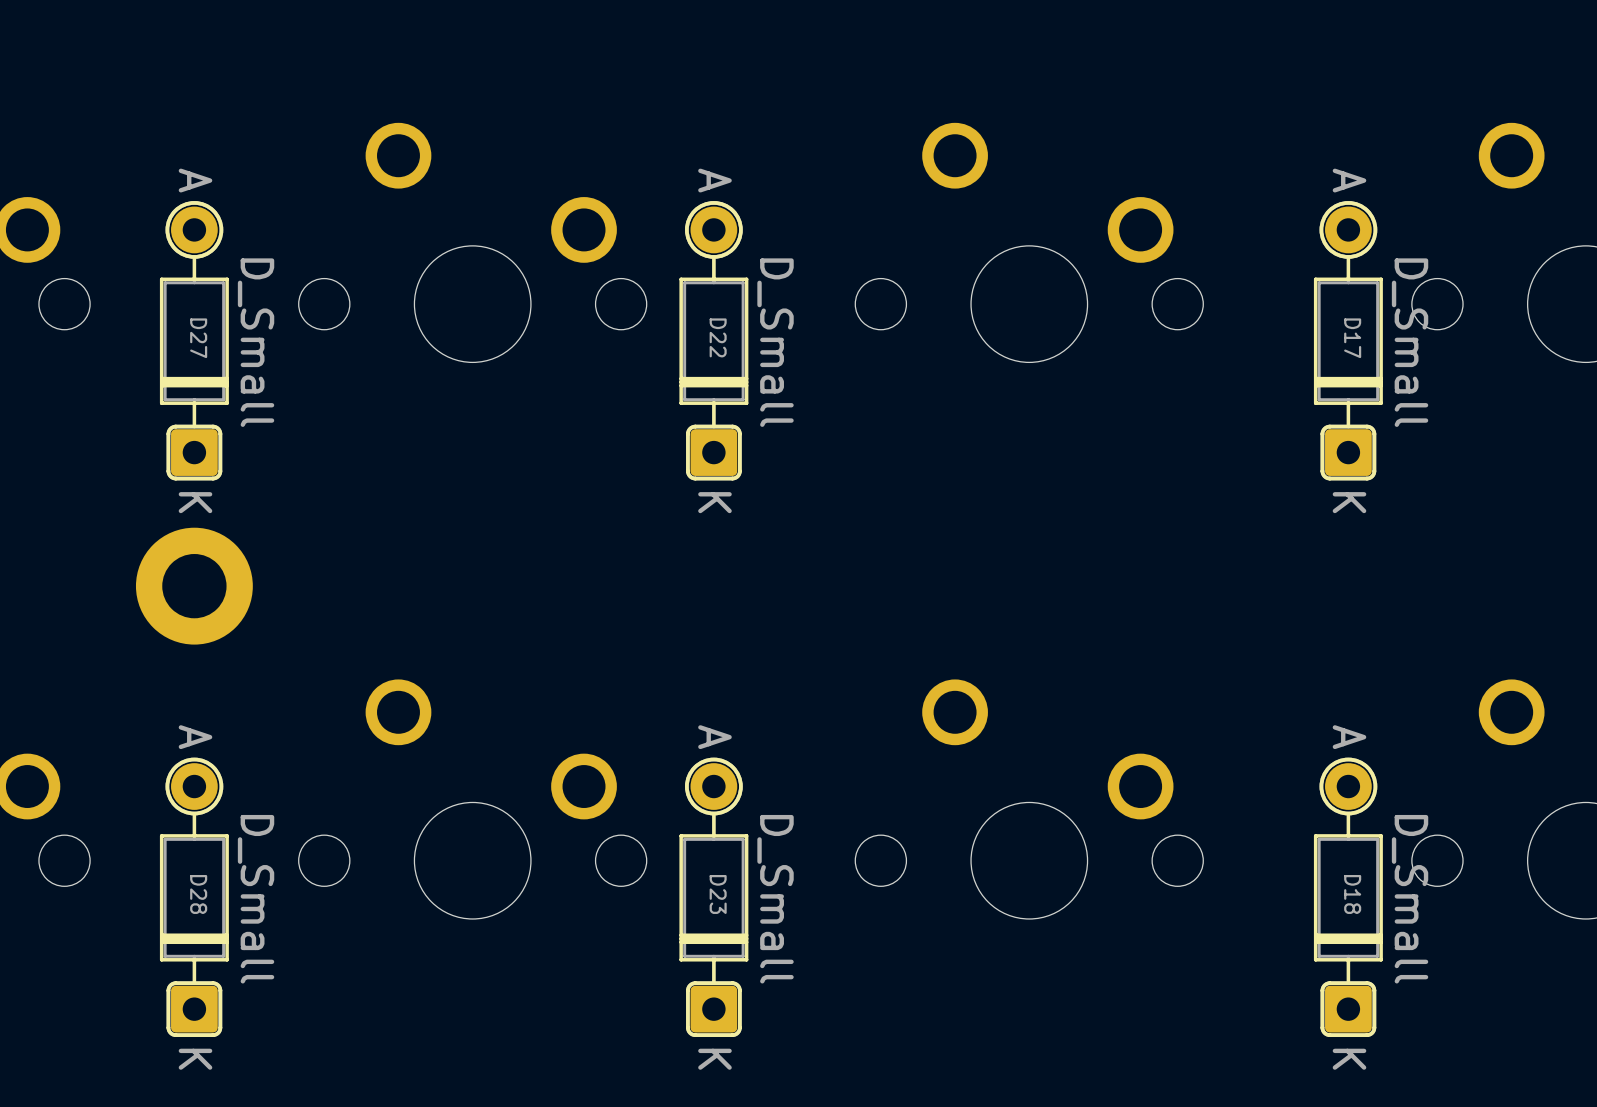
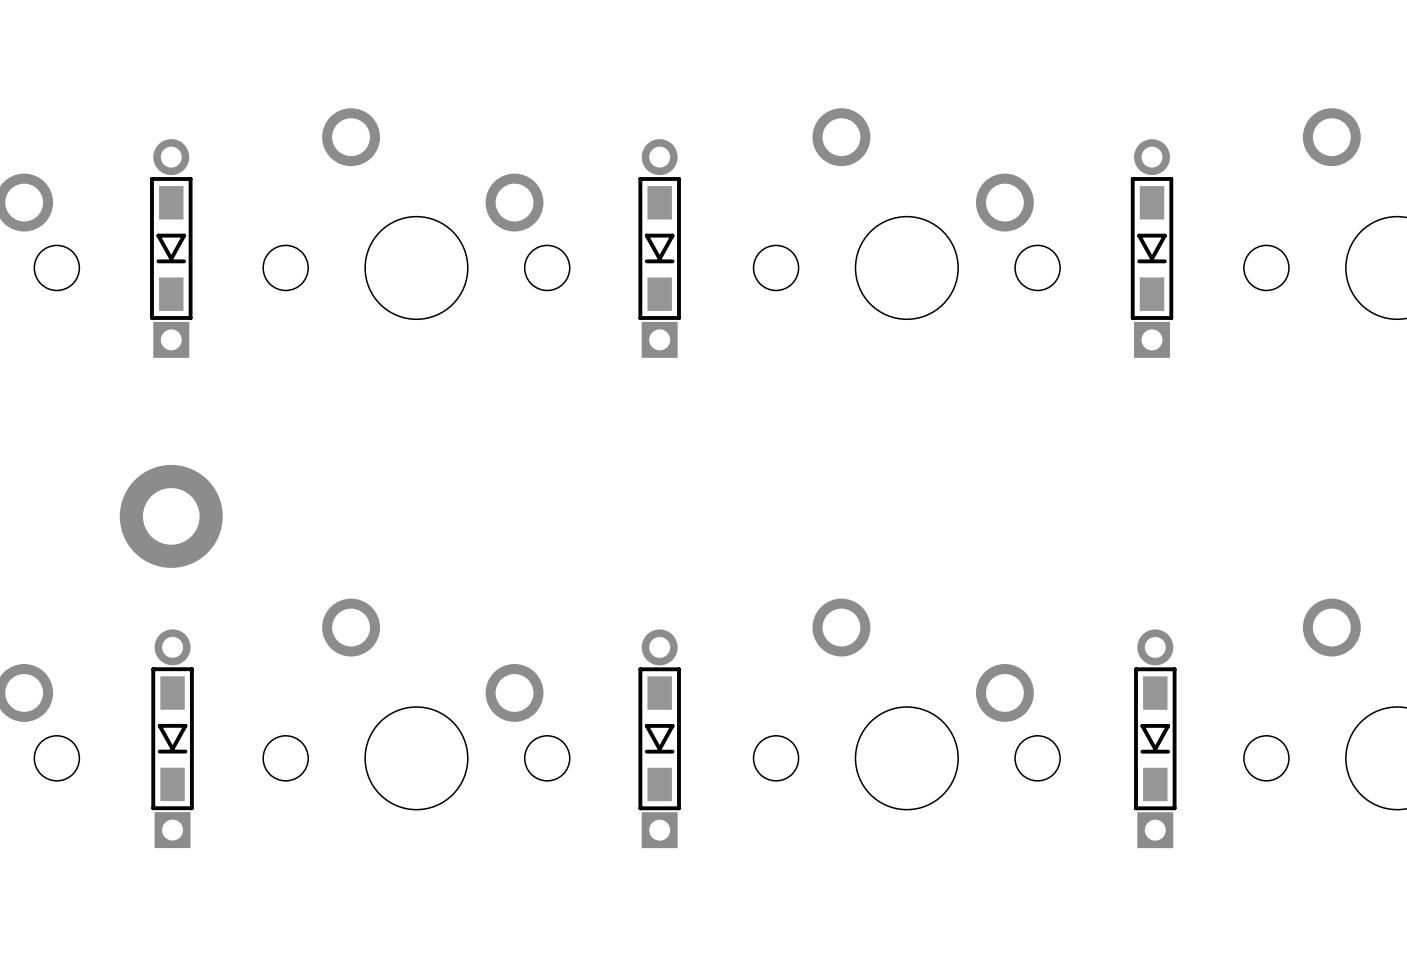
part: none -> (171, 248)
part: none -> (659, 248)
part: none -> (1152, 248)
D27: D_Small (194, 340) -> none
D22: D_Small (713, 340) -> none
D17: D_Small (1348, 340) -> none
part: none -> (172, 738)
part: none -> (659, 738)
part: none -> (1155, 738)
D28: D_Small (194, 897) -> none
D23: D_Small (713, 897) -> none
D18: D_Small (1348, 897) -> none

